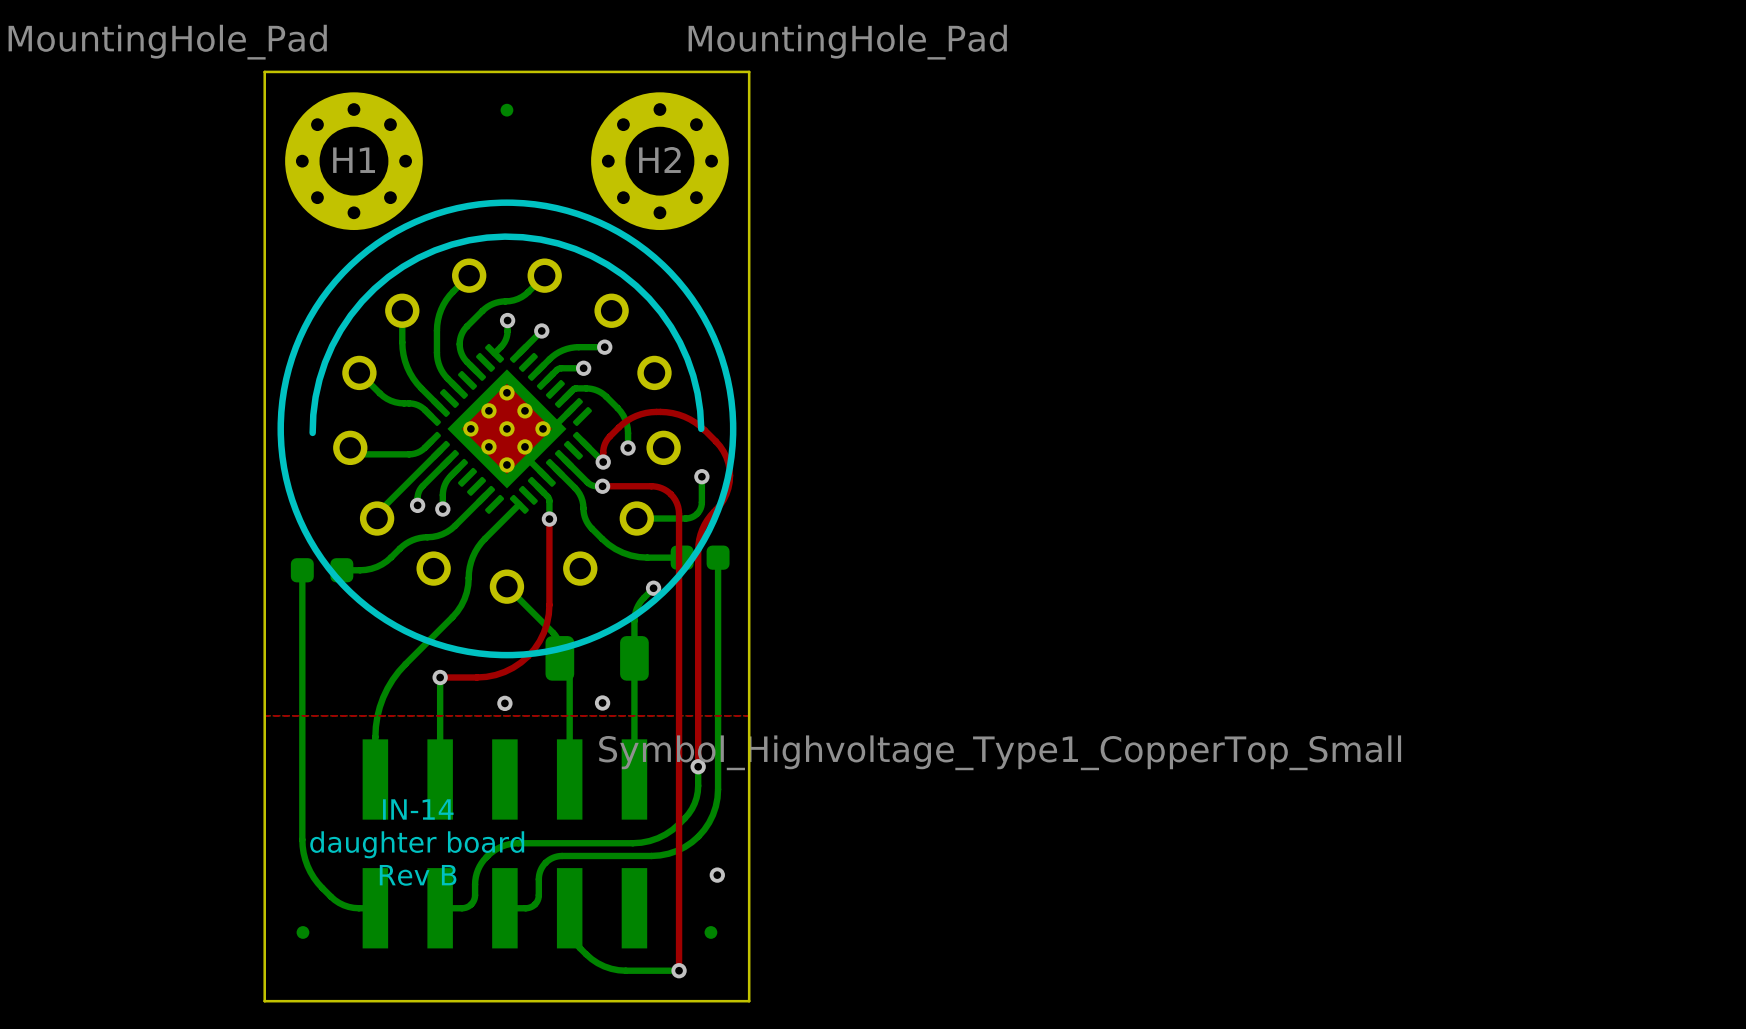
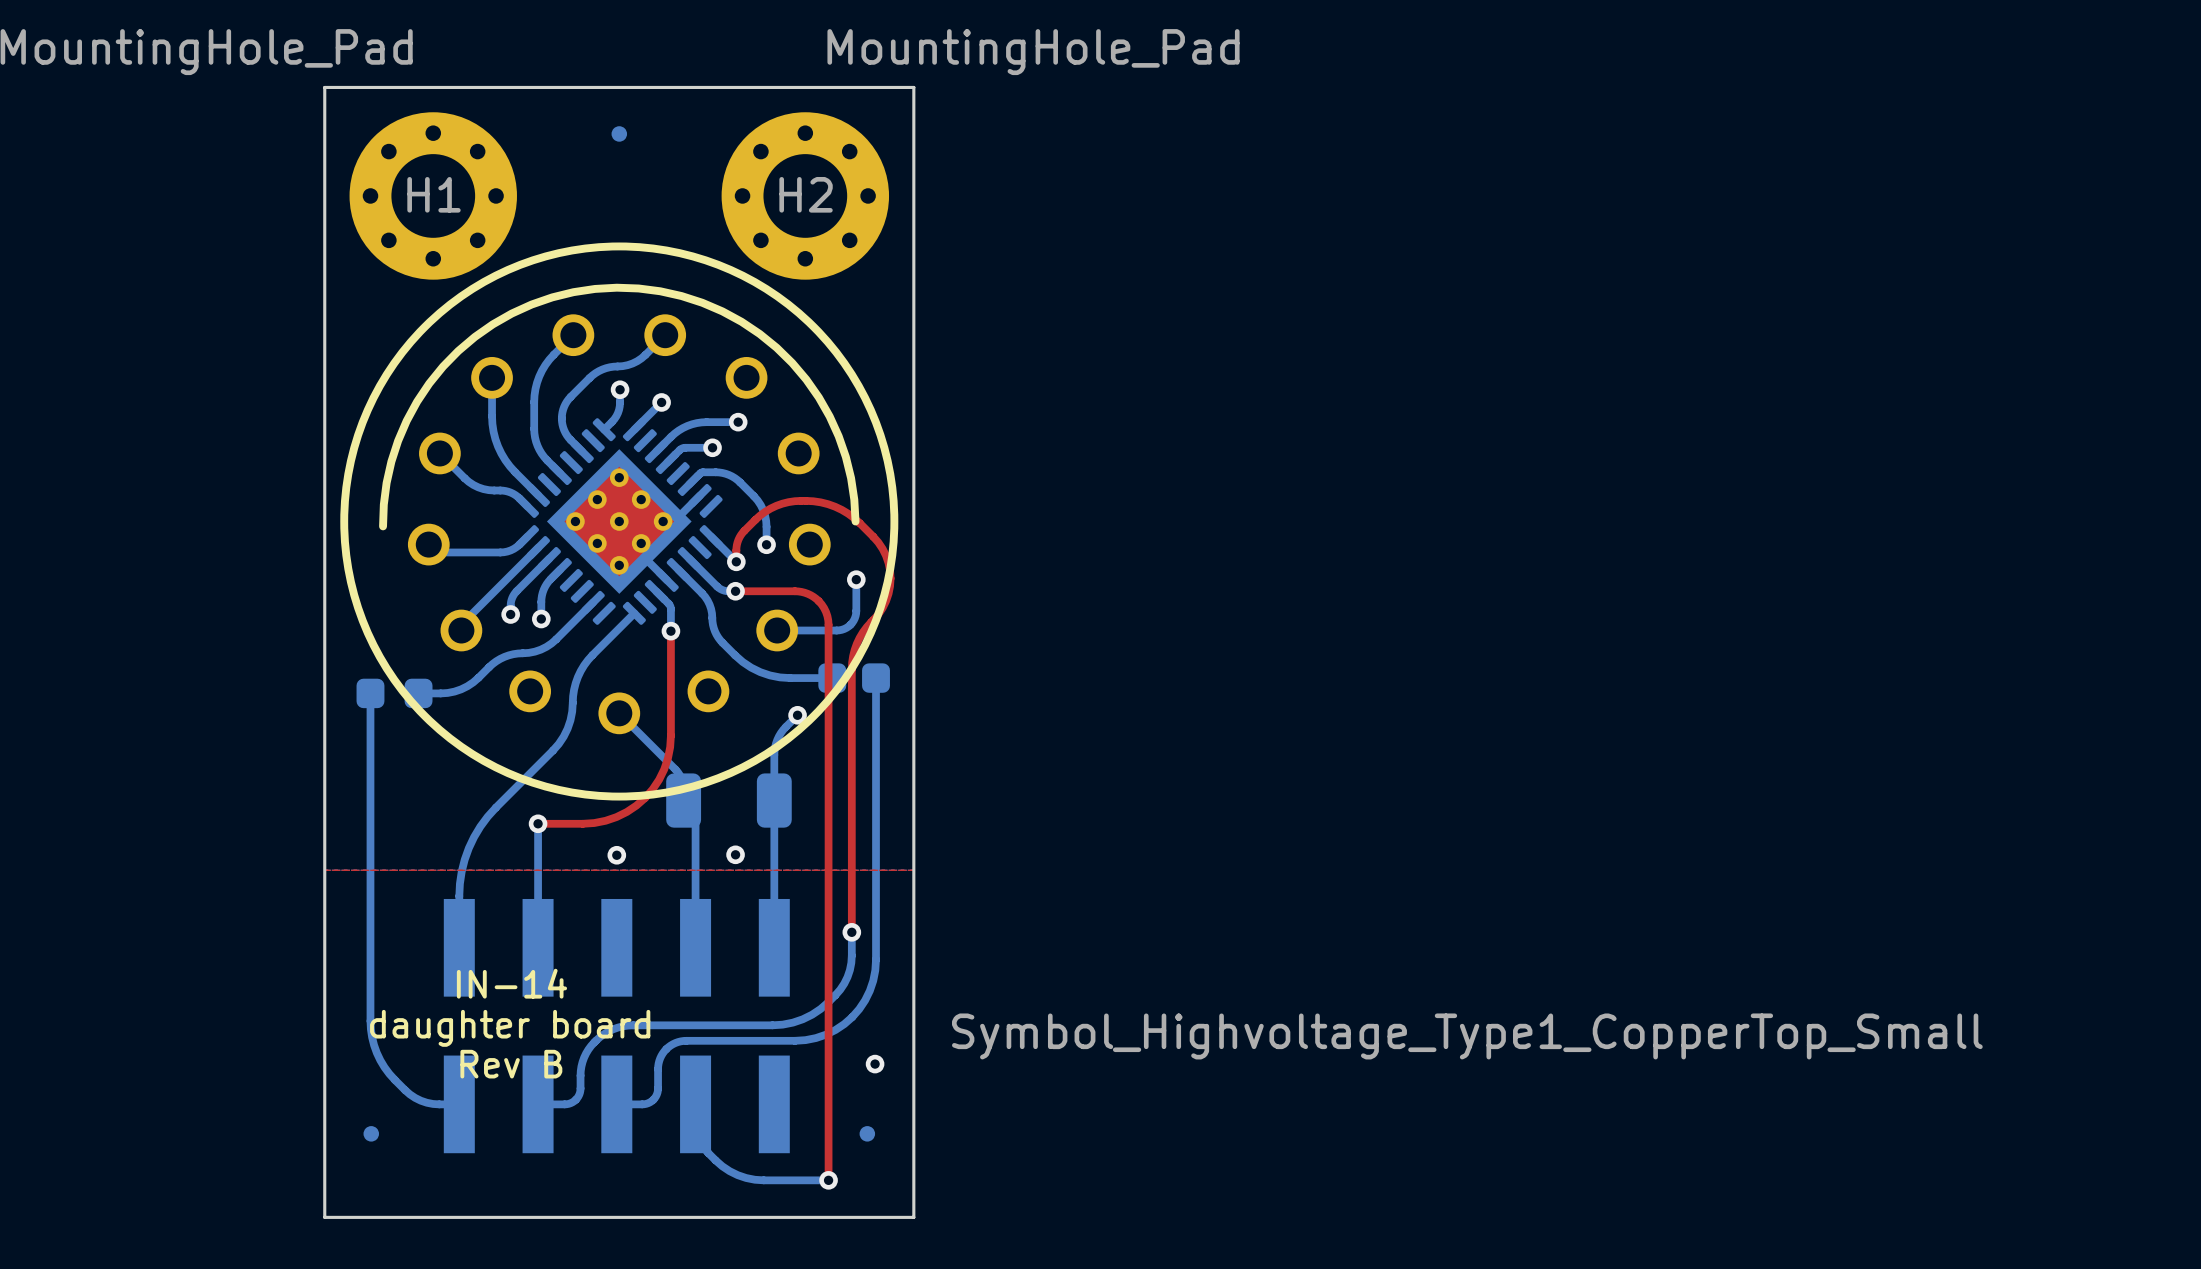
drawing position: (1000, 752) -> (1467, 1036)

